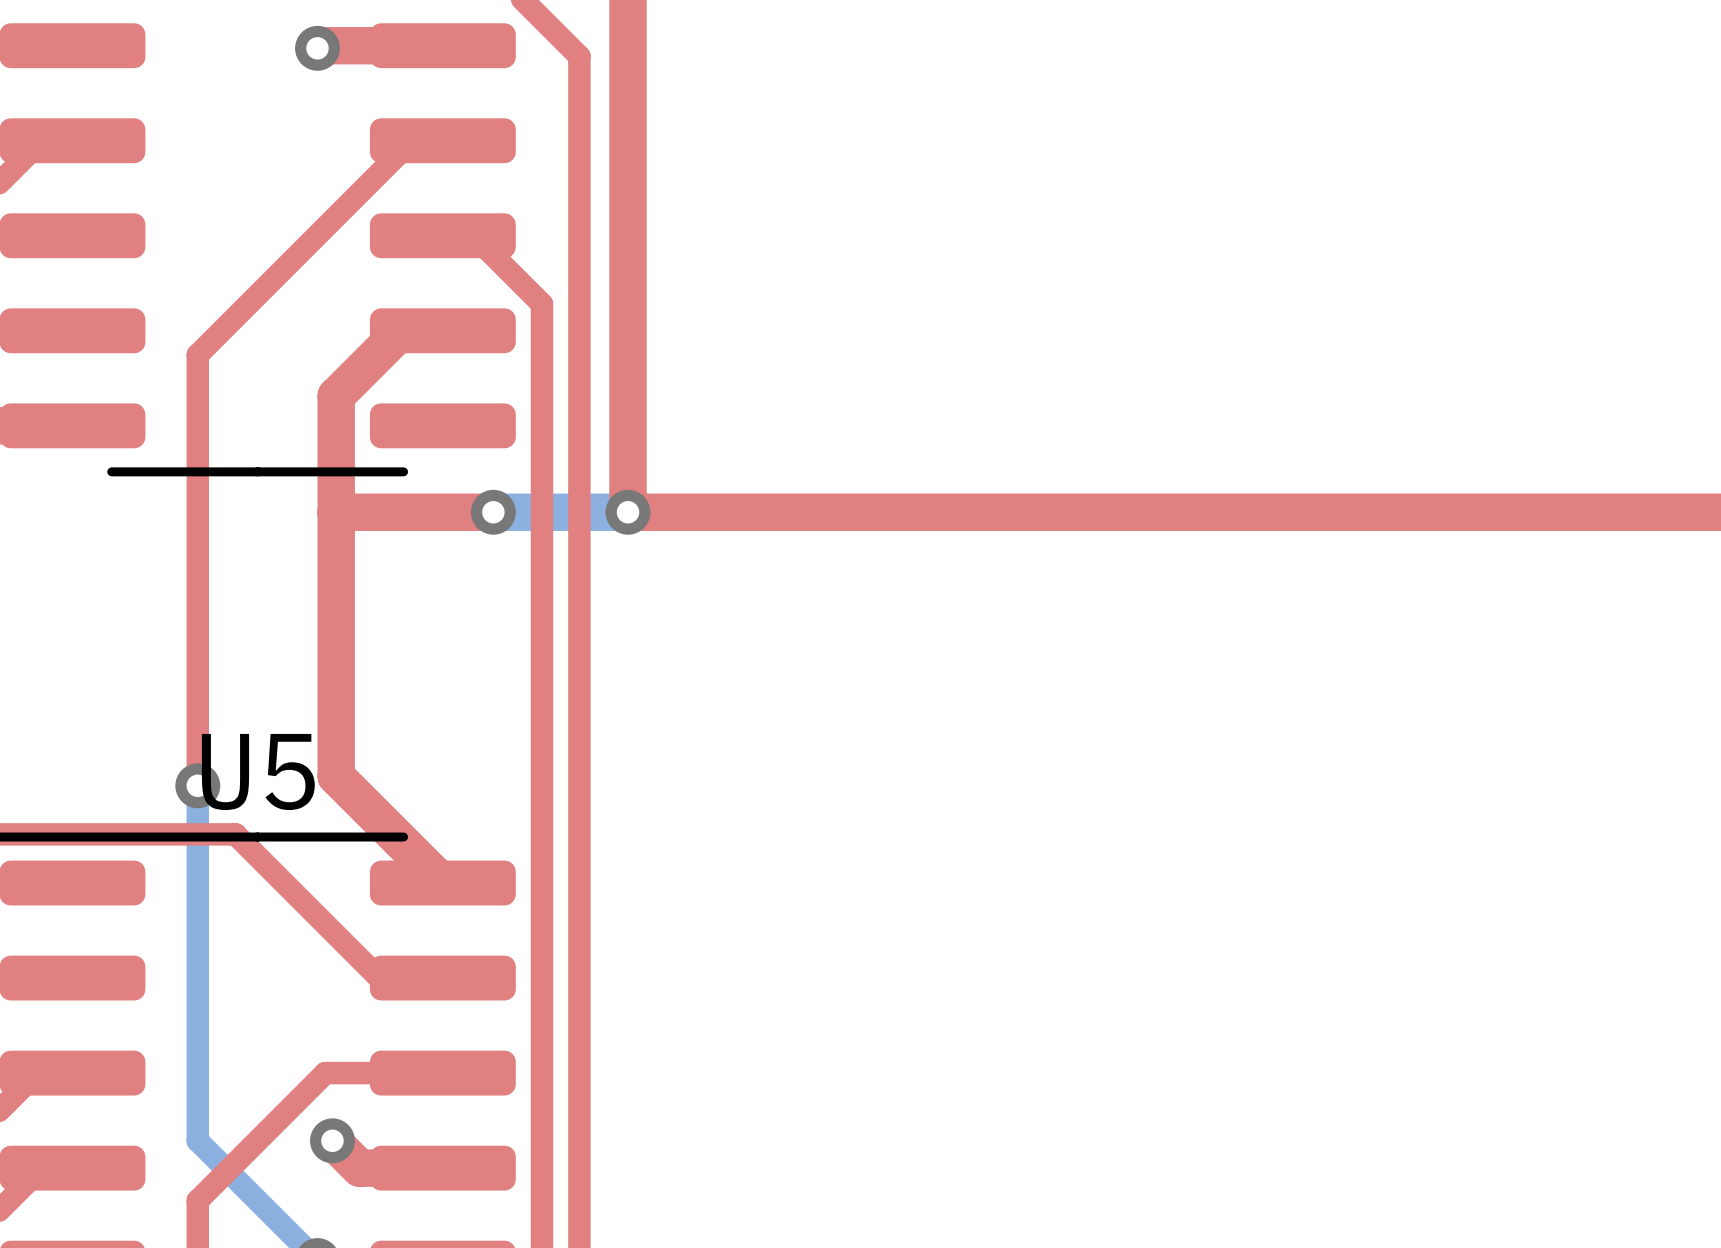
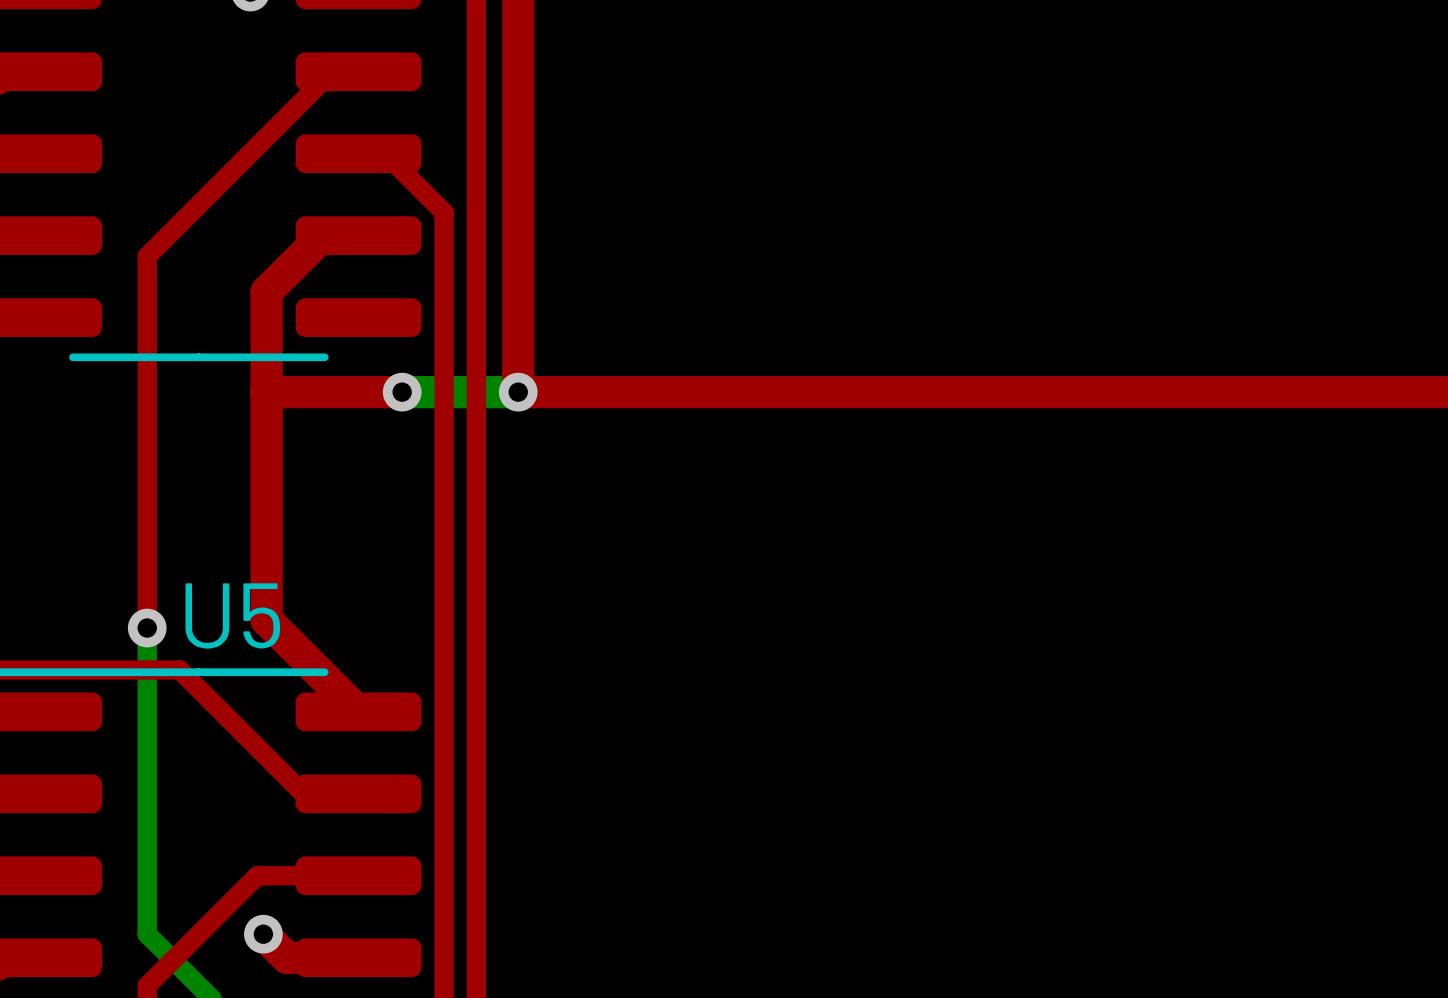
U5 name position: U5 (258, 772) -> U5 (232, 615)

